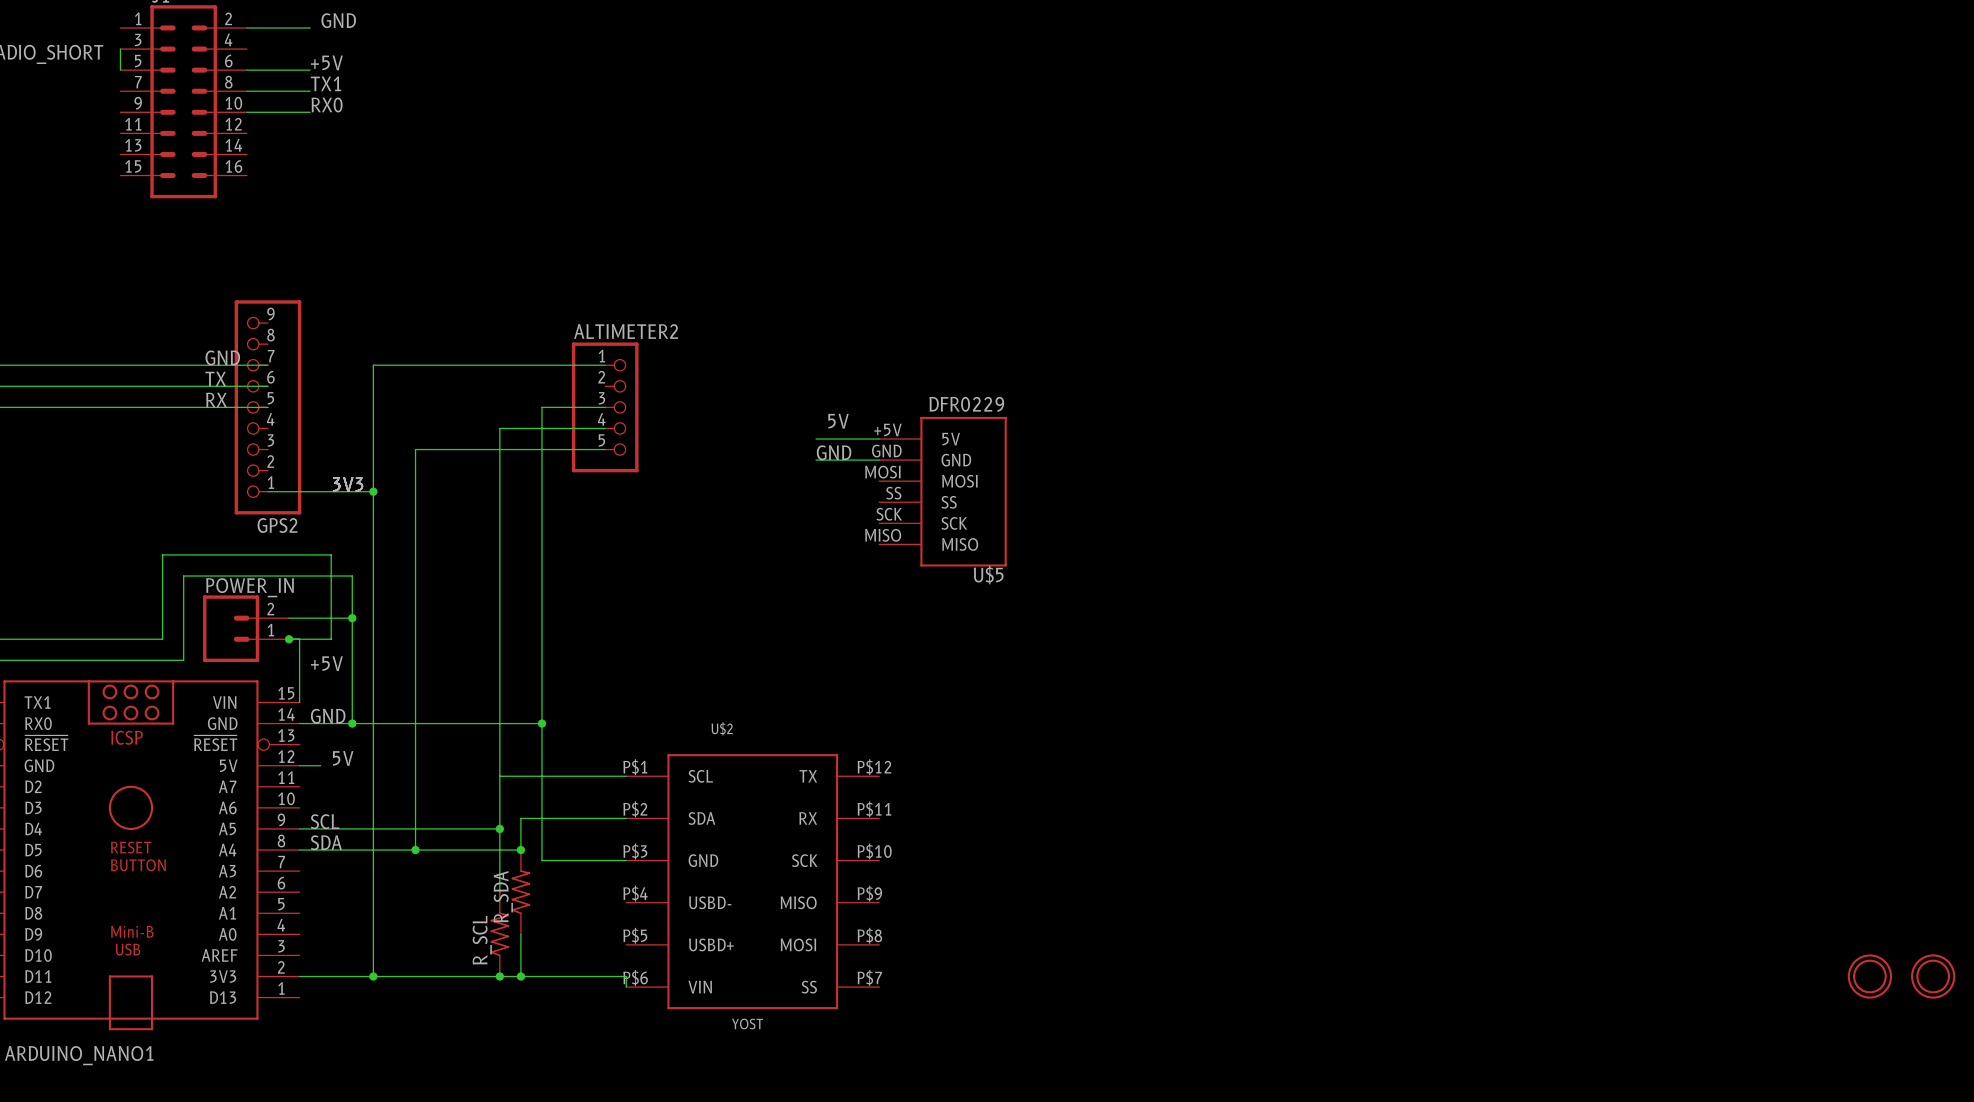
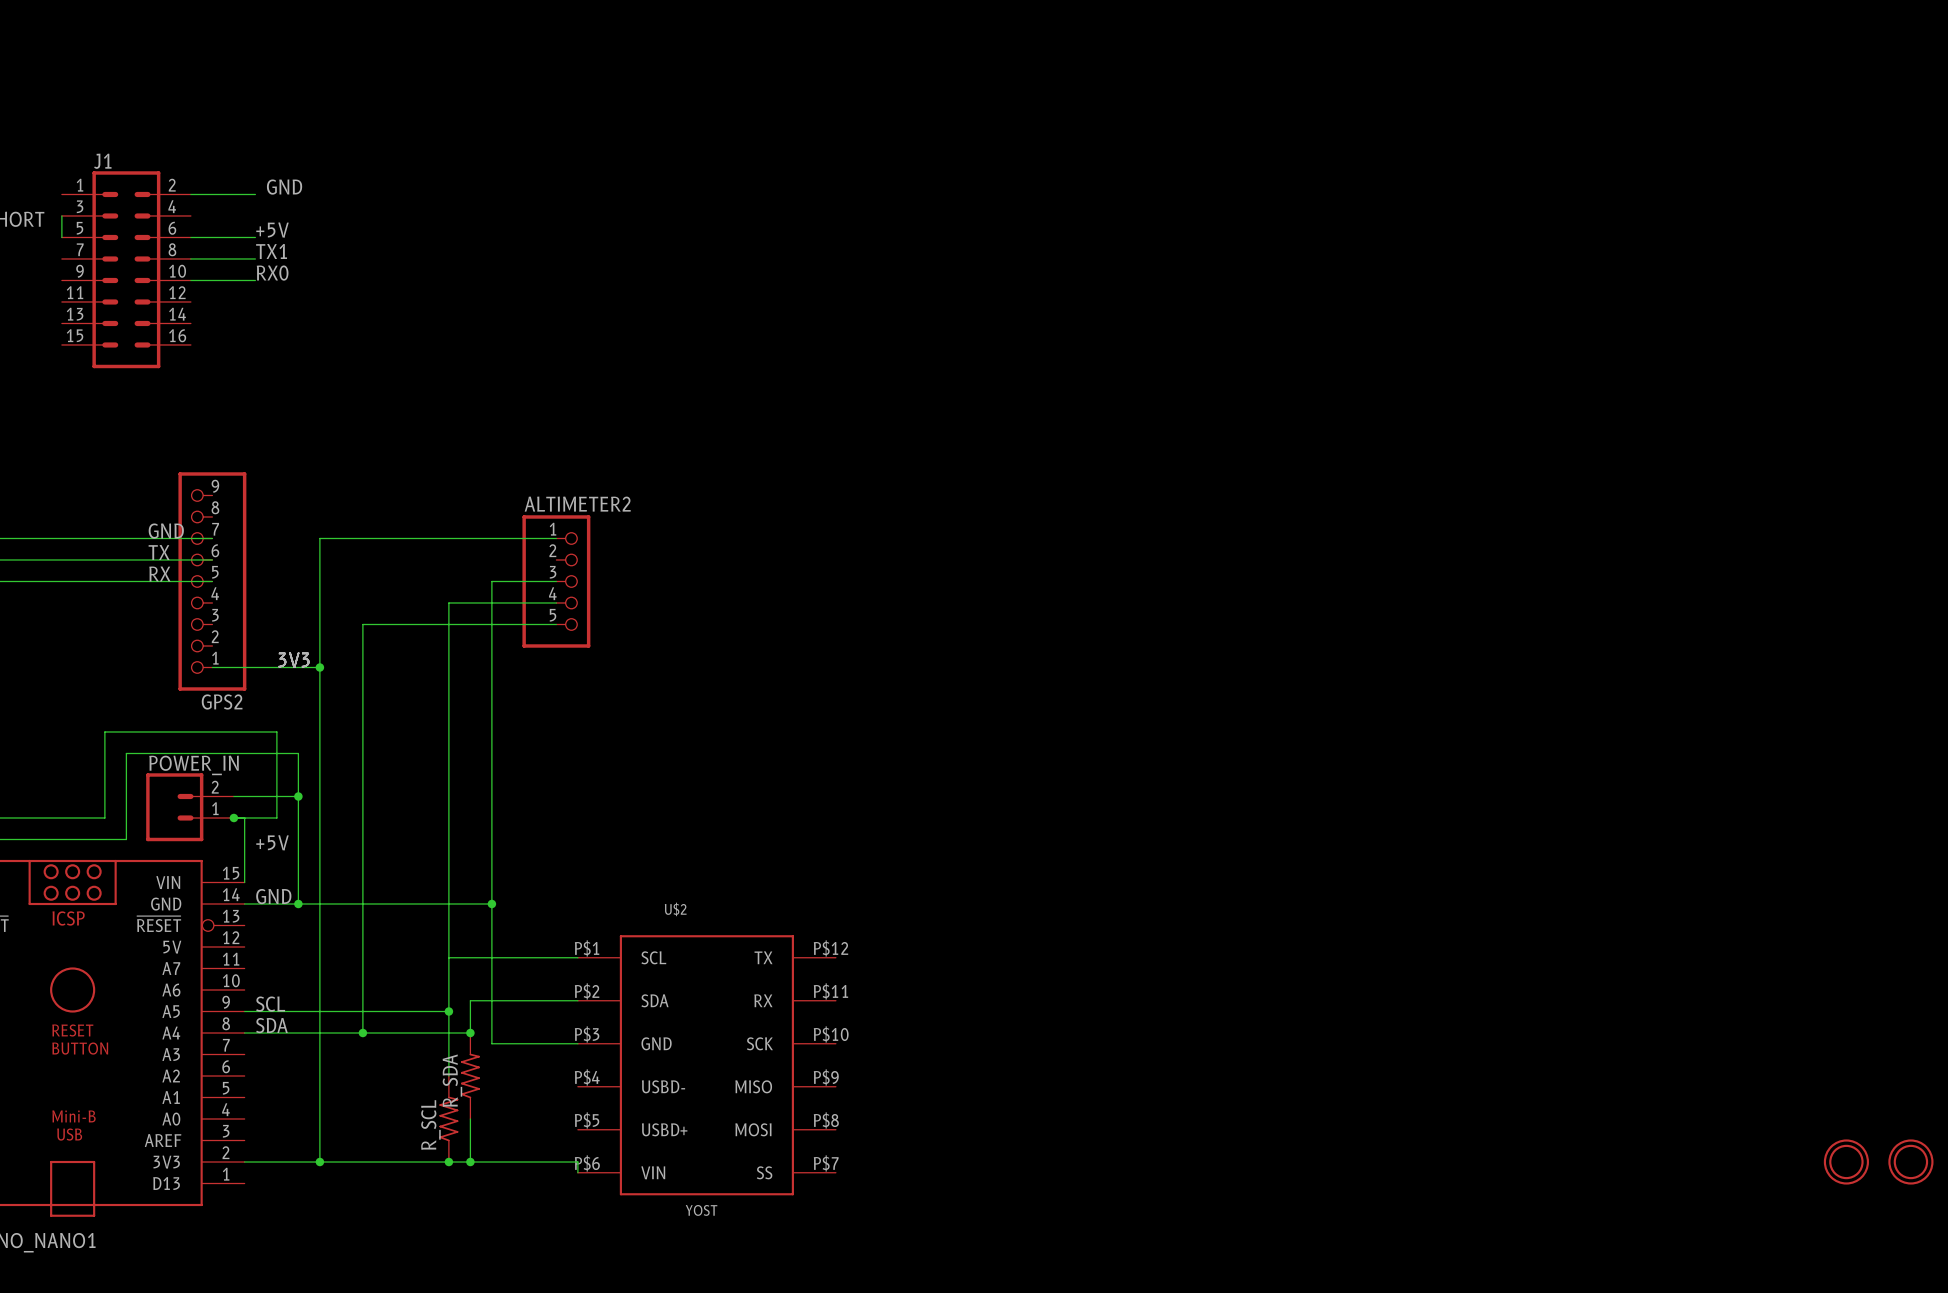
label: 5V (838, 421) -> none
wire: (816, 439) (879, 439) -> none
label: GND (834, 452) -> none
wire: (816, 460) (879, 460) -> none
U$5: DFR0229 (943, 491) -> none
label: 5V (343, 758) -> none
wire: (299, 765) (320, 765) -> none

